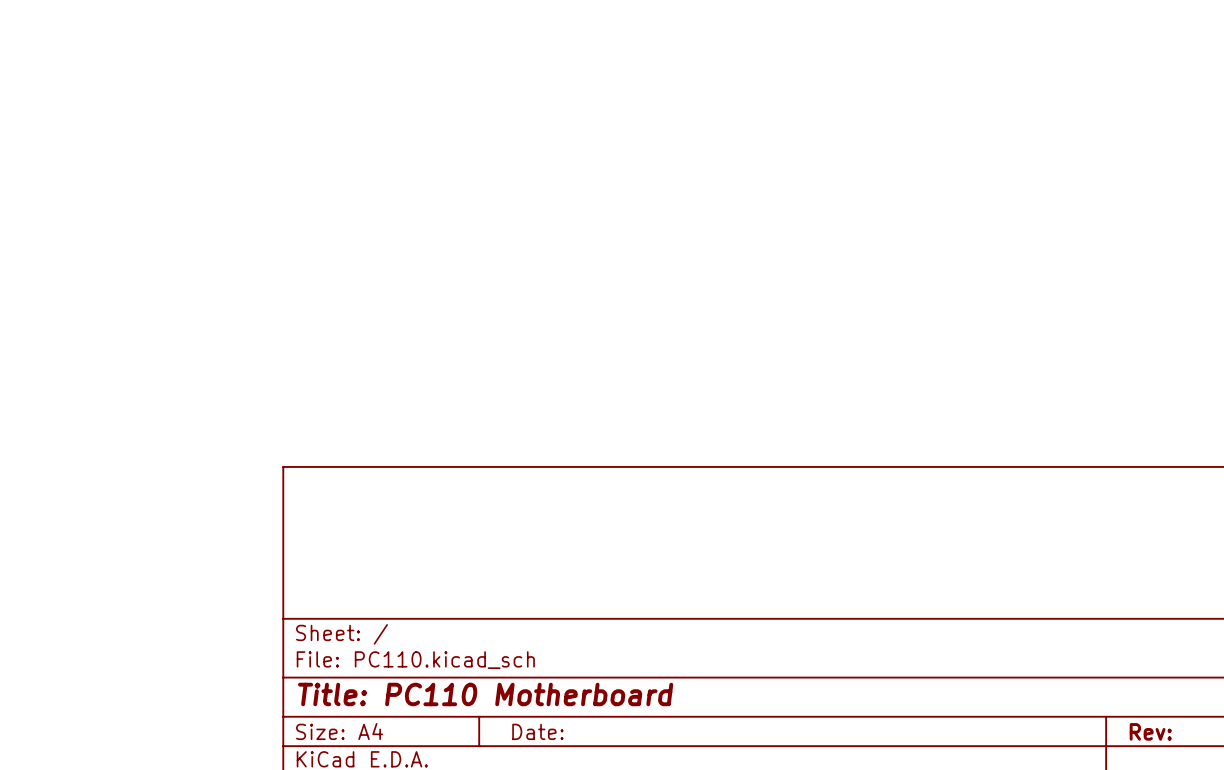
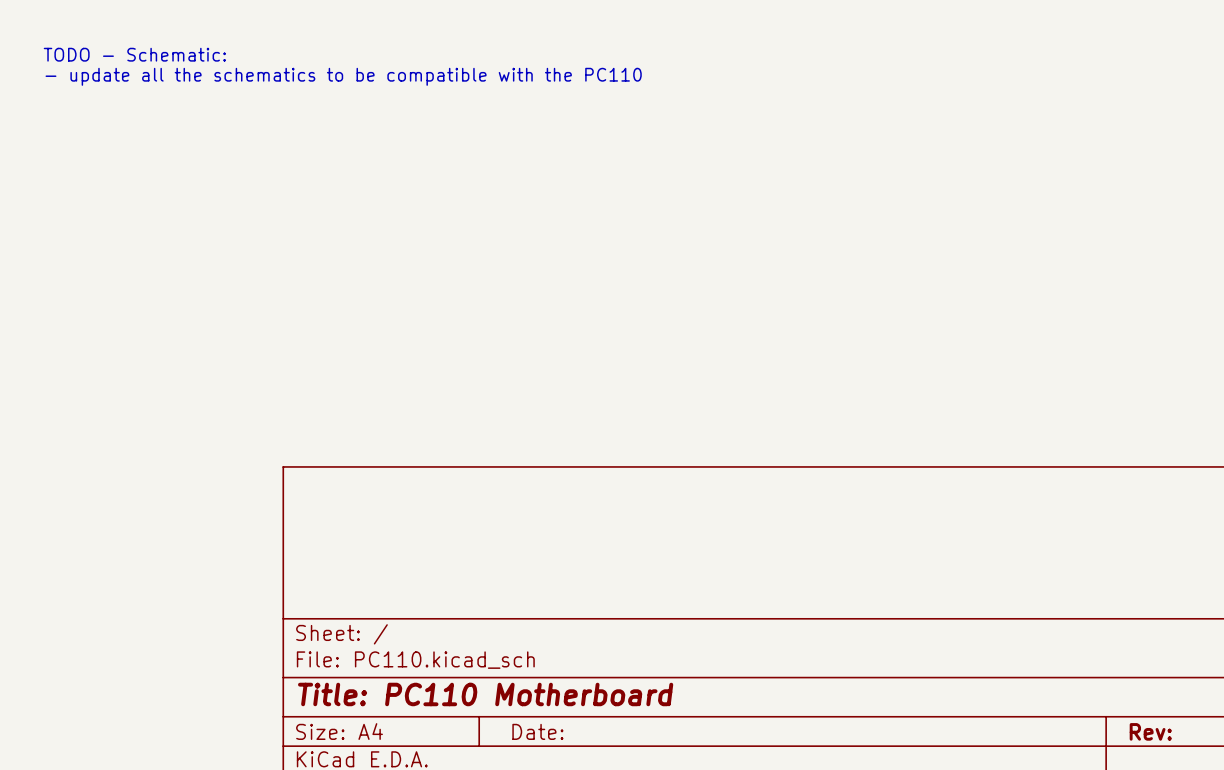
text: none -> TODO - Schematic: (134, 54)
text: none -> - update all the schematics to be compatible with the PC110 (343, 76)

